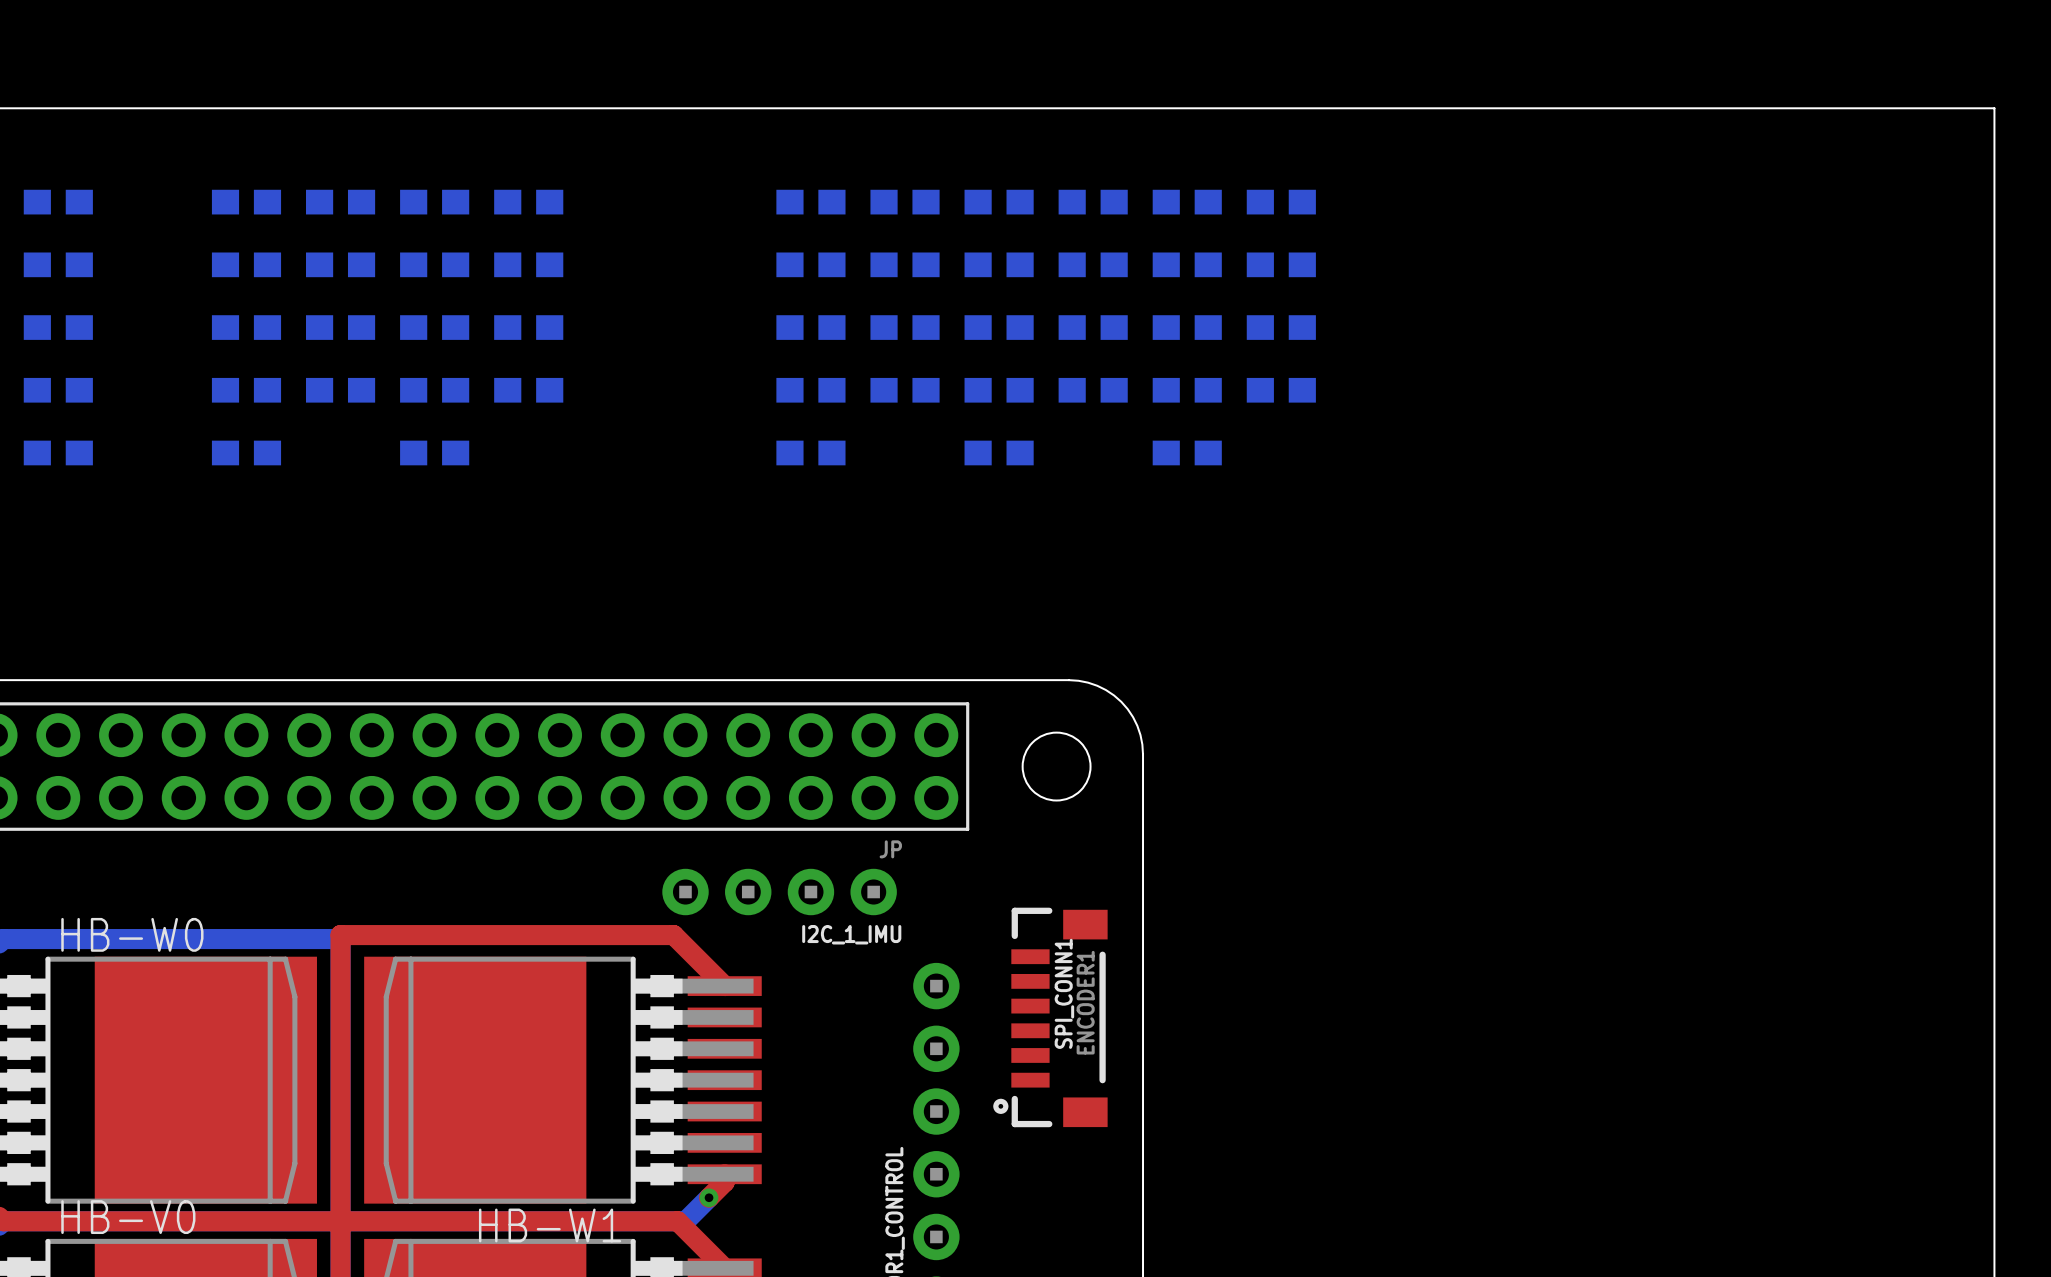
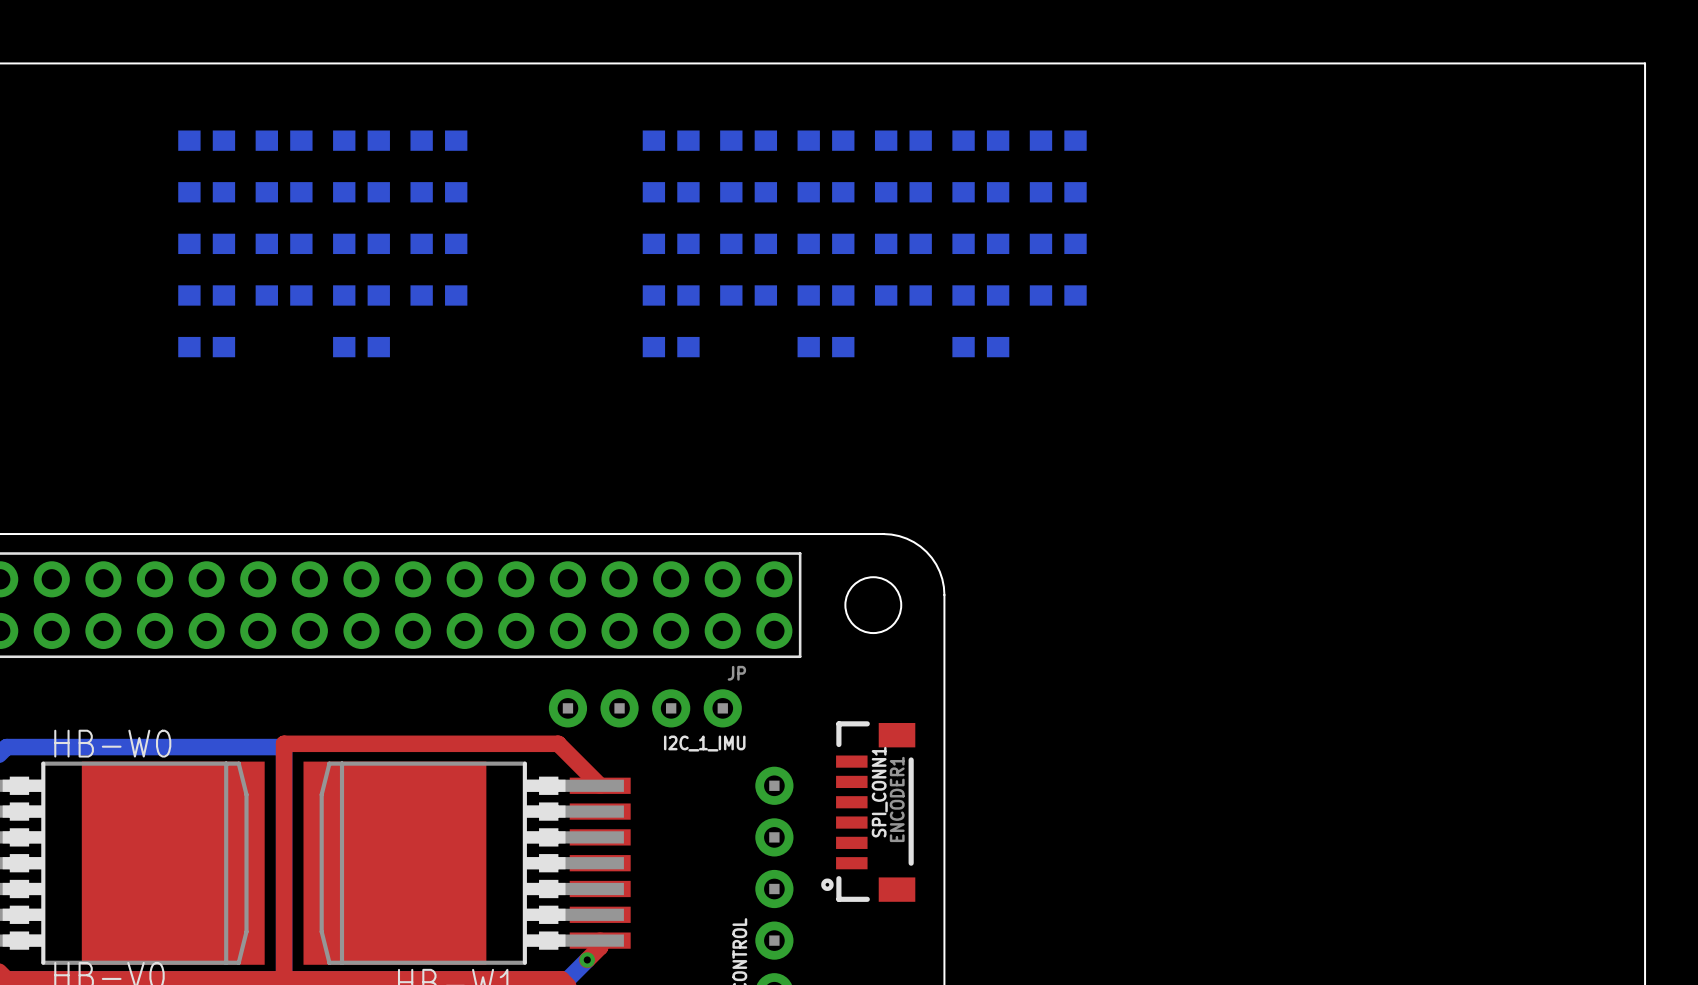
part: (58, 202) -> none
part: (58, 264) -> none
part: (58, 327) -> none
part: (58, 390) -> none
part: (58, 452) -> none

